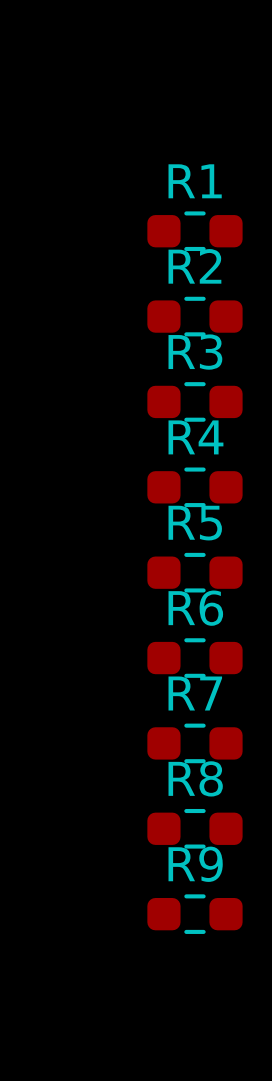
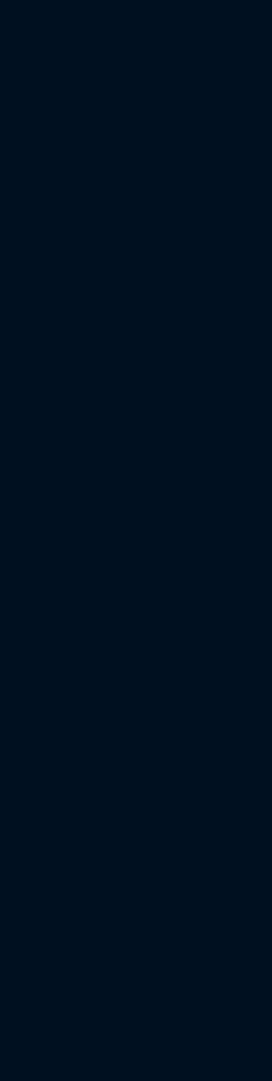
R1: (194, 231) -> none
R2: (194, 316) -> none
R3: (194, 401) -> none
R4: (194, 487) -> none
R5: (194, 572) -> none
R6: (194, 658) -> none
R7: (194, 743) -> none
R8: (194, 828) -> none
R9: (194, 914) -> none

